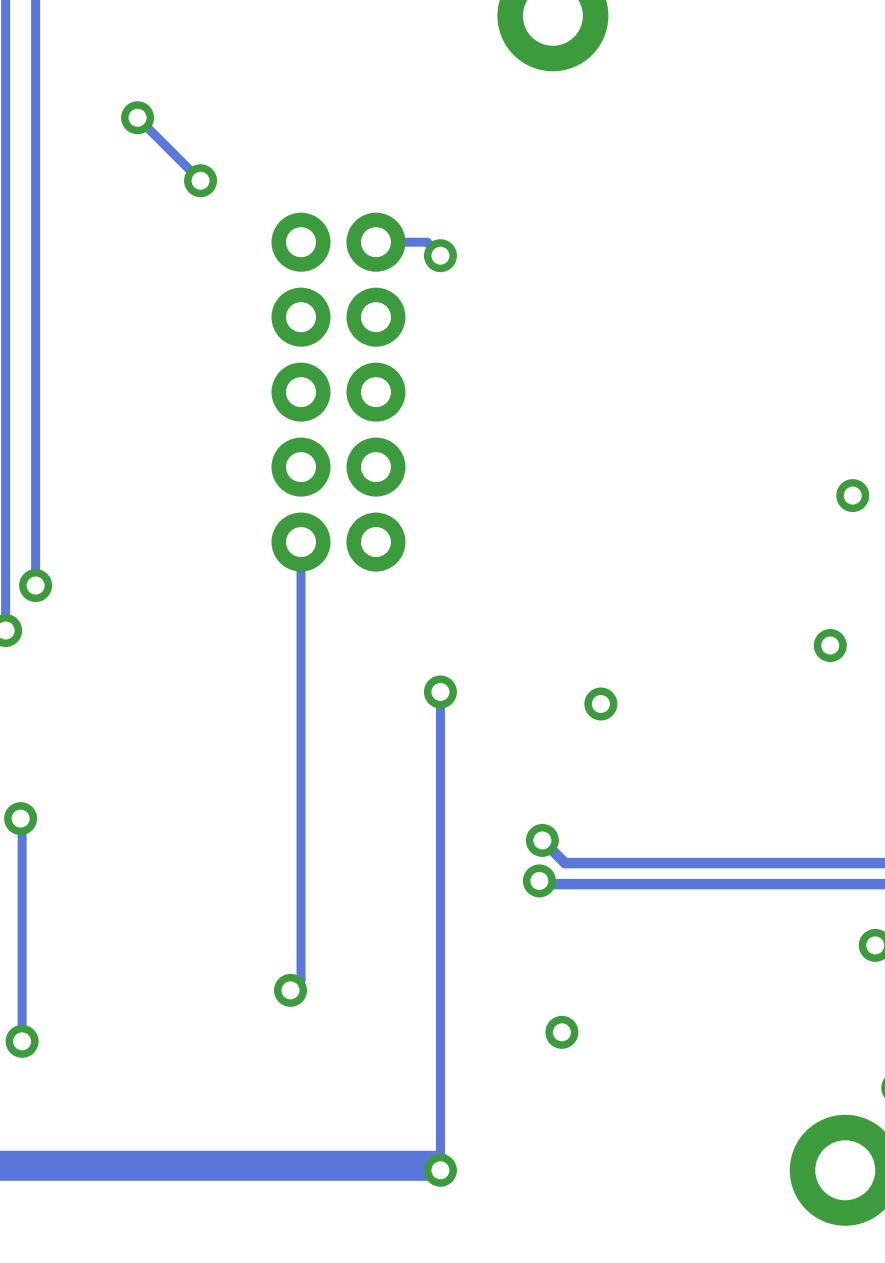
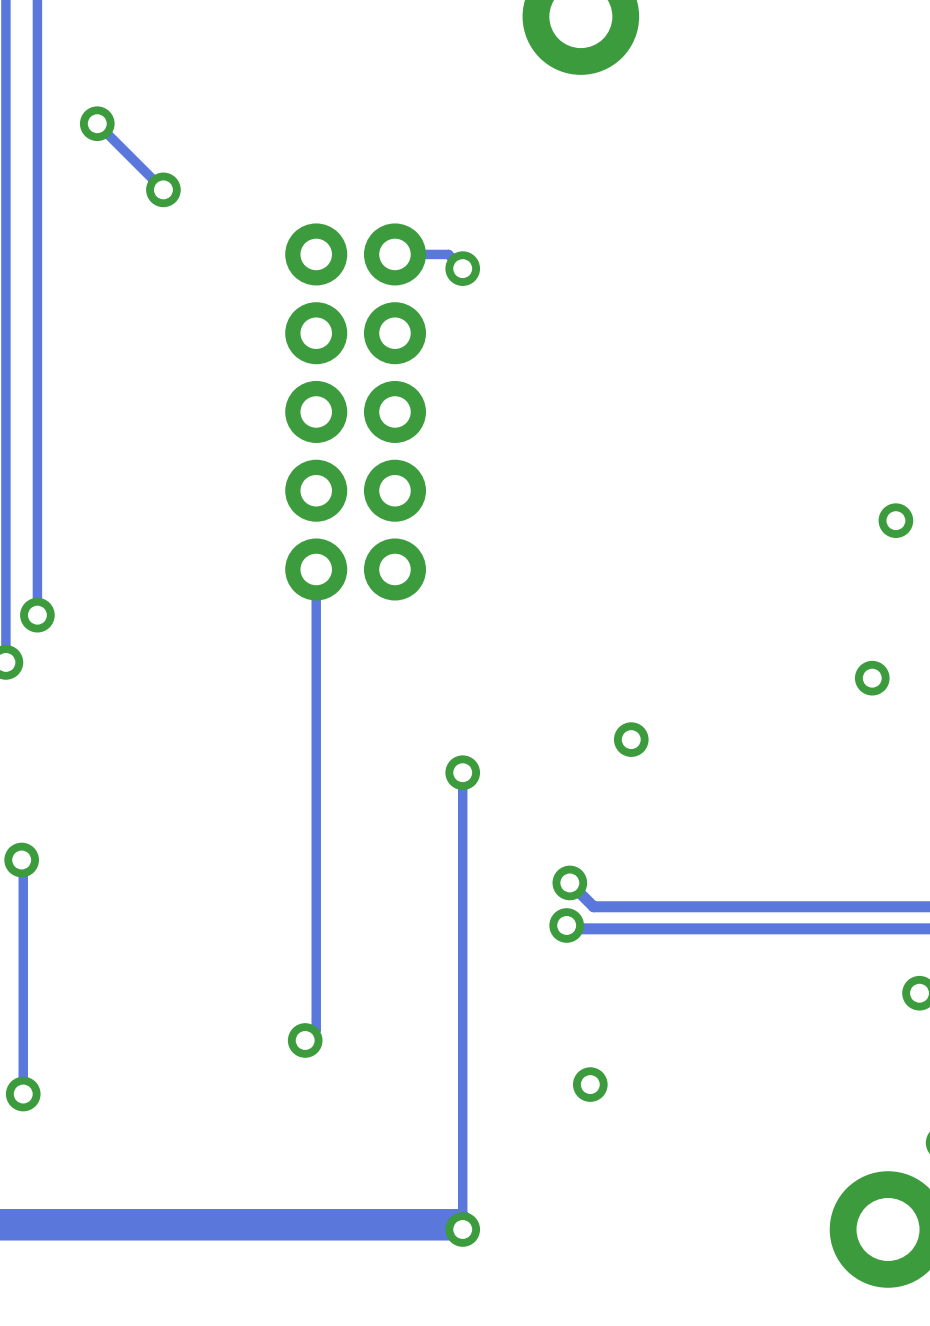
via: none -> (97, 123)
track: (137, 117) (200, 180) -> (97, 123) (163, 189)
via: (137, 117) -> none
via: none -> (163, 189)
via: (200, 180) -> none
track: (440, 692) (440, 735) -> none
via position: (440, 692) -> (462, 772)

